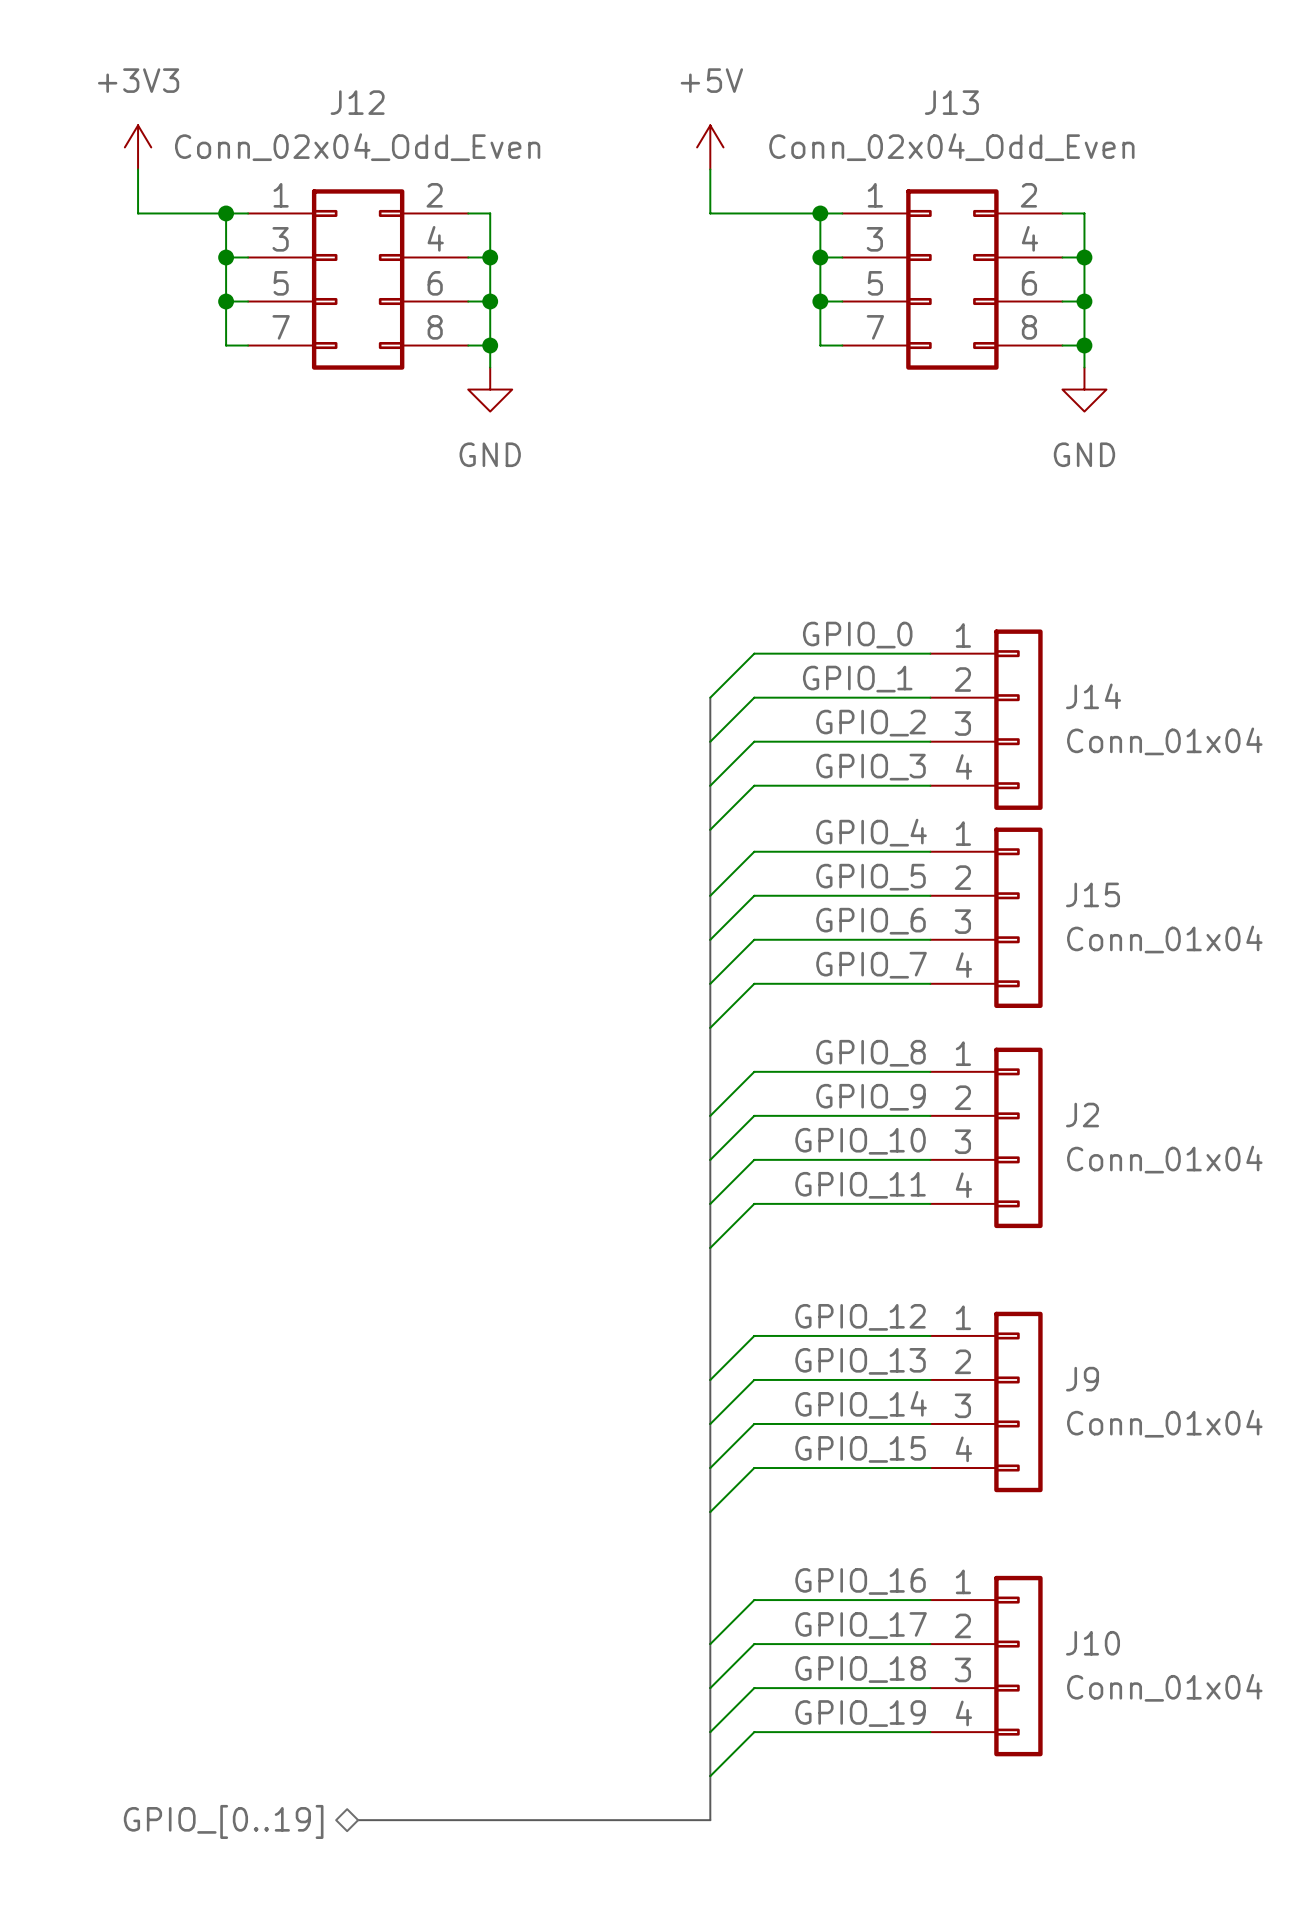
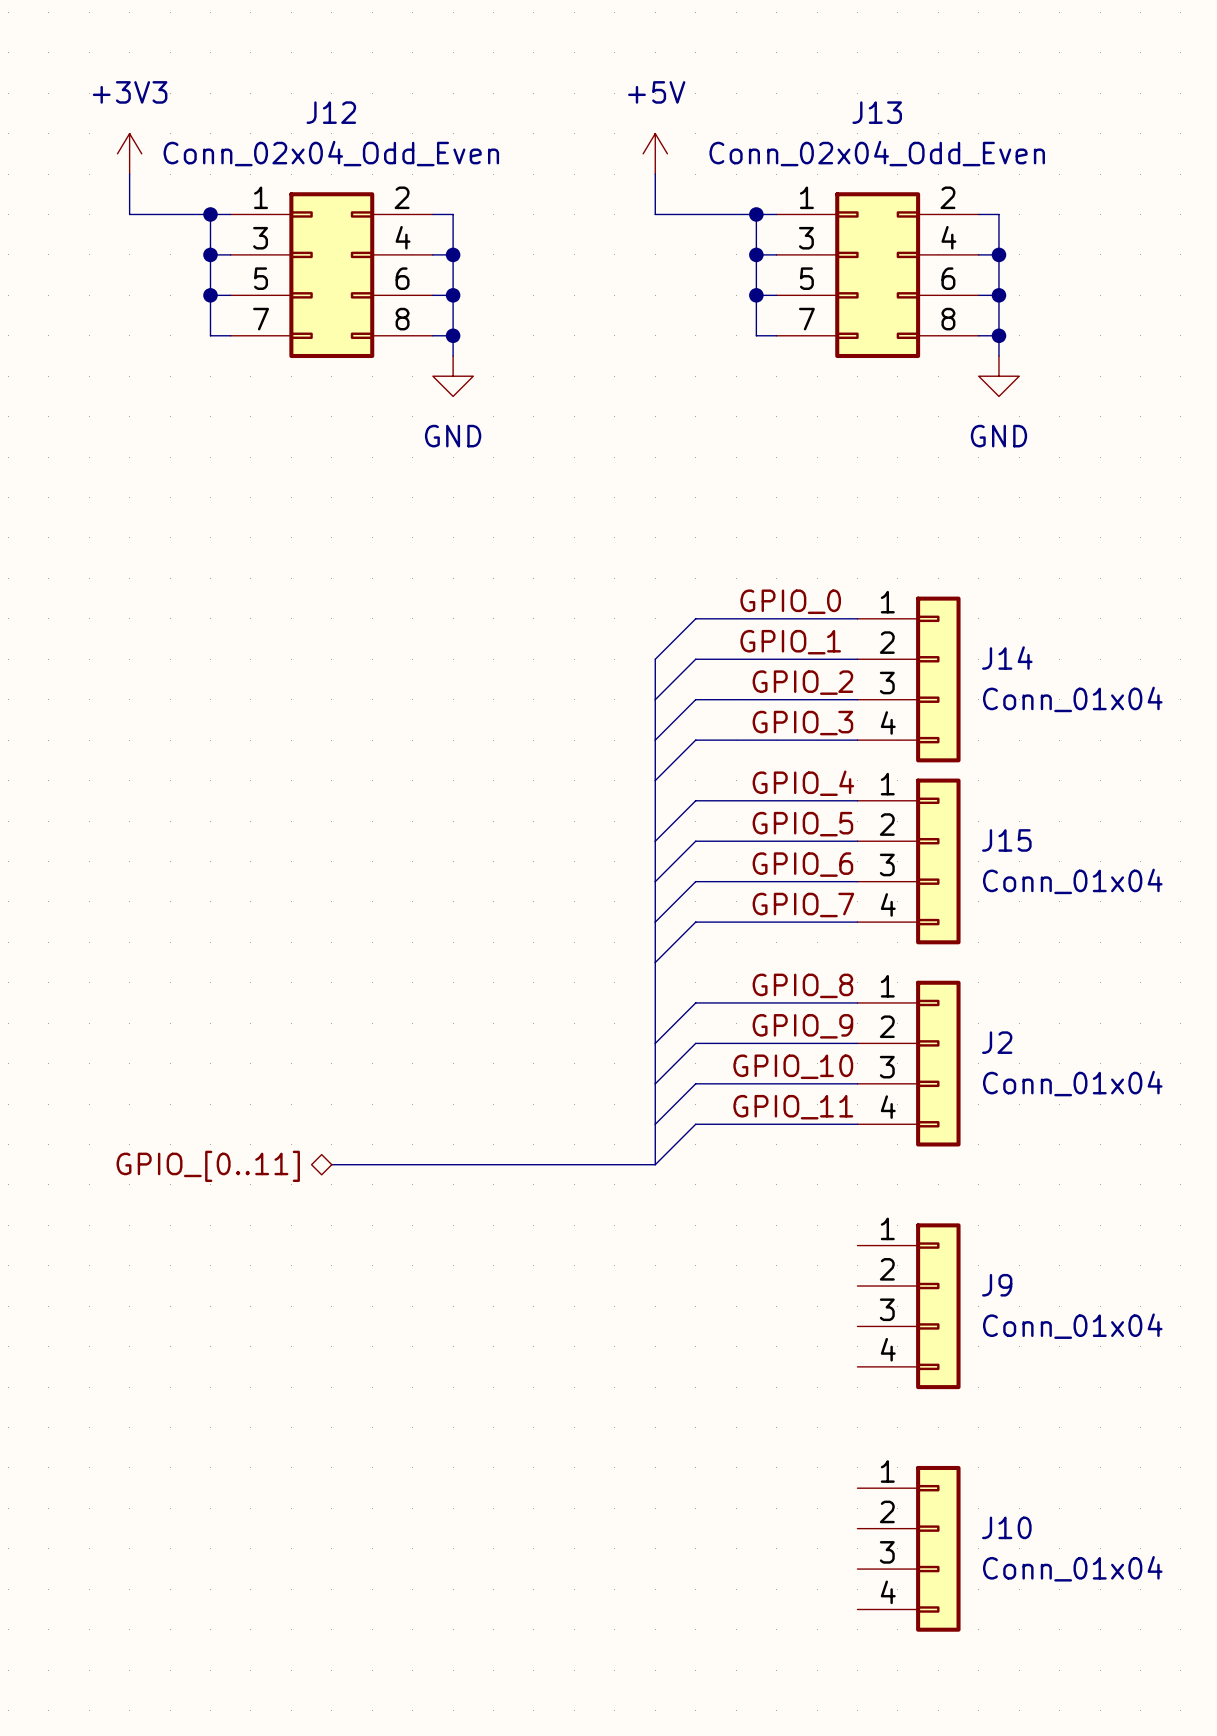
bus: (710, 1247) (710, 1820) (358, 1820) -> (655, 1164) (331, 1164)
hierarchical label: none -> GPIO_[0..11] (208, 1166)
label: GPIO_12 (860, 1317) -> none
wire: (930, 1335) (754, 1335) (710, 1379) -> none
label: GPIO_13 (860, 1361) -> none
wire: (930, 1379) (754, 1379) (710, 1423) -> none
label: GPIO_14 (861, 1404) -> none
wire: (930, 1423) (754, 1423) (710, 1468) -> none
label: GPIO_15 (860, 1449) -> none
wire: (930, 1468) (754, 1468) (710, 1512) -> none
label: GPIO_16 (860, 1581) -> none
wire: (930, 1600) (754, 1600) (710, 1644) -> none
label: GPIO_17 (861, 1625) -> none
wire: (930, 1644) (754, 1644) (710, 1688) -> none
label: GPIO_18 (860, 1669) -> none
wire: (930, 1688) (754, 1688) (710, 1732) -> none
label: GPIO_19 (860, 1713) -> none
wire: (930, 1732) (754, 1732) (710, 1776) -> none
hierarchical label: GPIO_[0..19] (223, 1821) -> none

